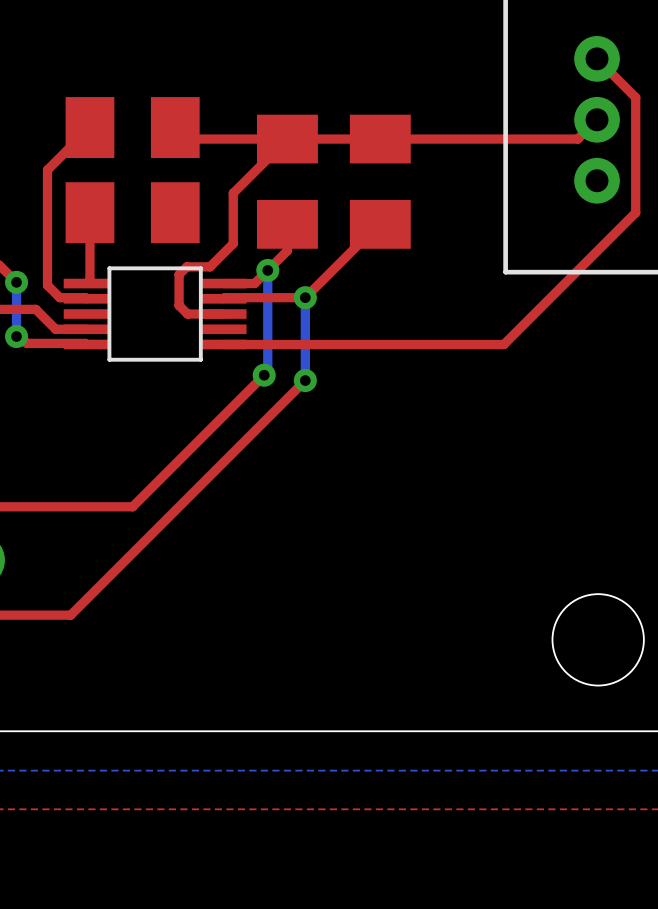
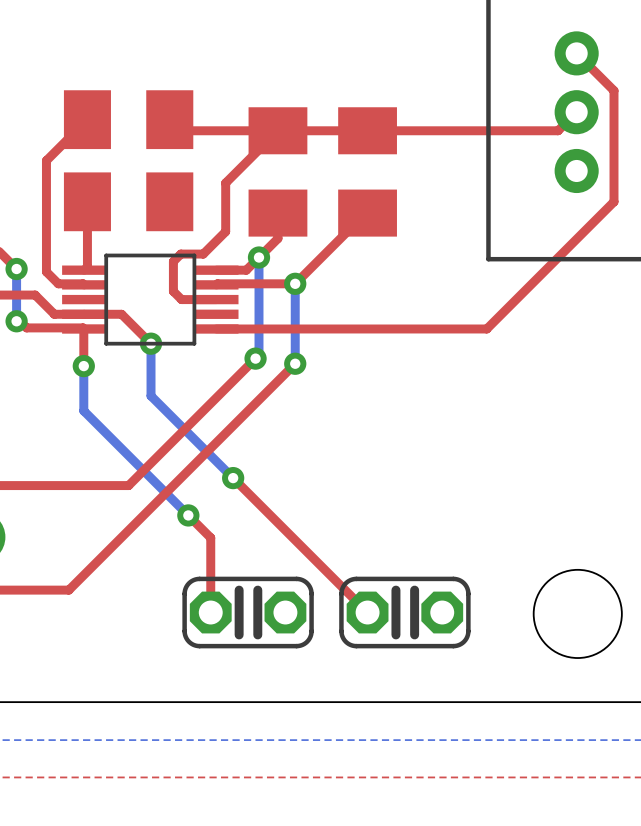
top track: none -> (84, 314) (121, 314) (151, 343)
top track: none -> (83, 329) (83, 366)
bottom track: none -> (151, 343) (151, 395) (233, 478)
via: none -> (151, 343)
bottom track: none -> (83, 366) (83, 410) (188, 515)
via: none -> (83, 366)
top track: none -> (233, 478) (367, 612)
via: none -> (233, 478)
top track: none -> (188, 515) (210, 537) (210, 612)
via: none -> (188, 515)
part: none -> (248, 612)
part: none -> (404, 612)

